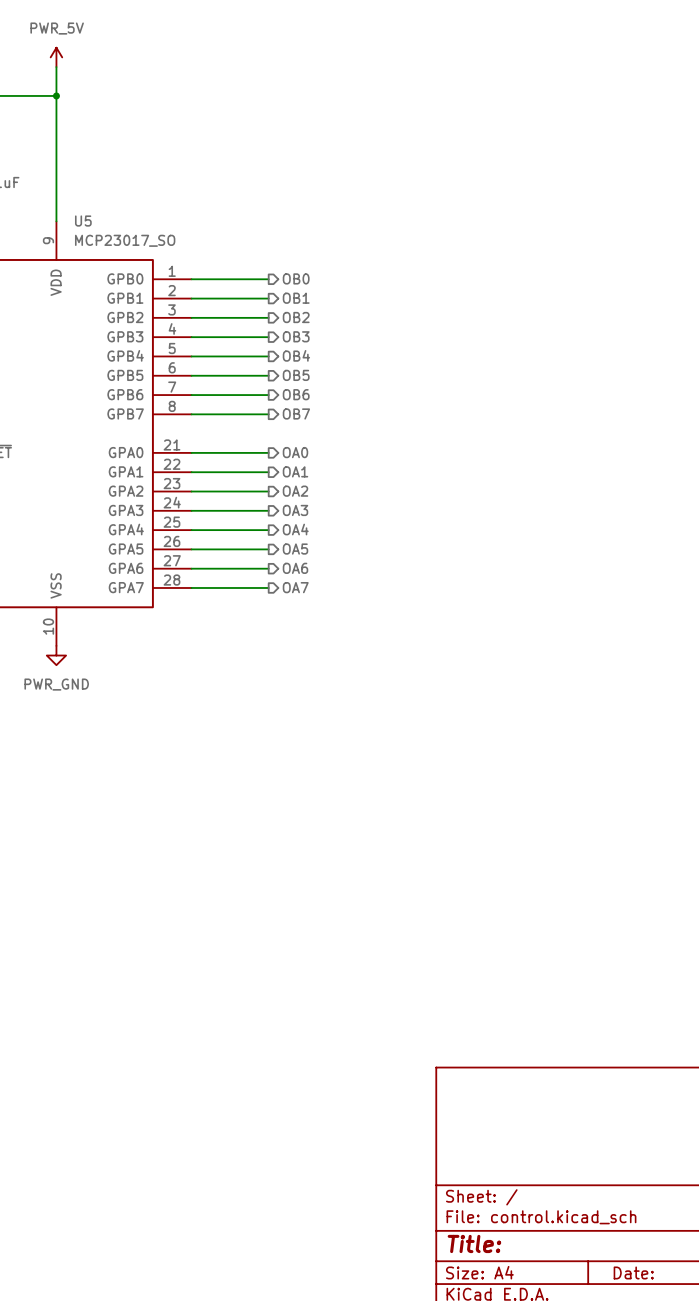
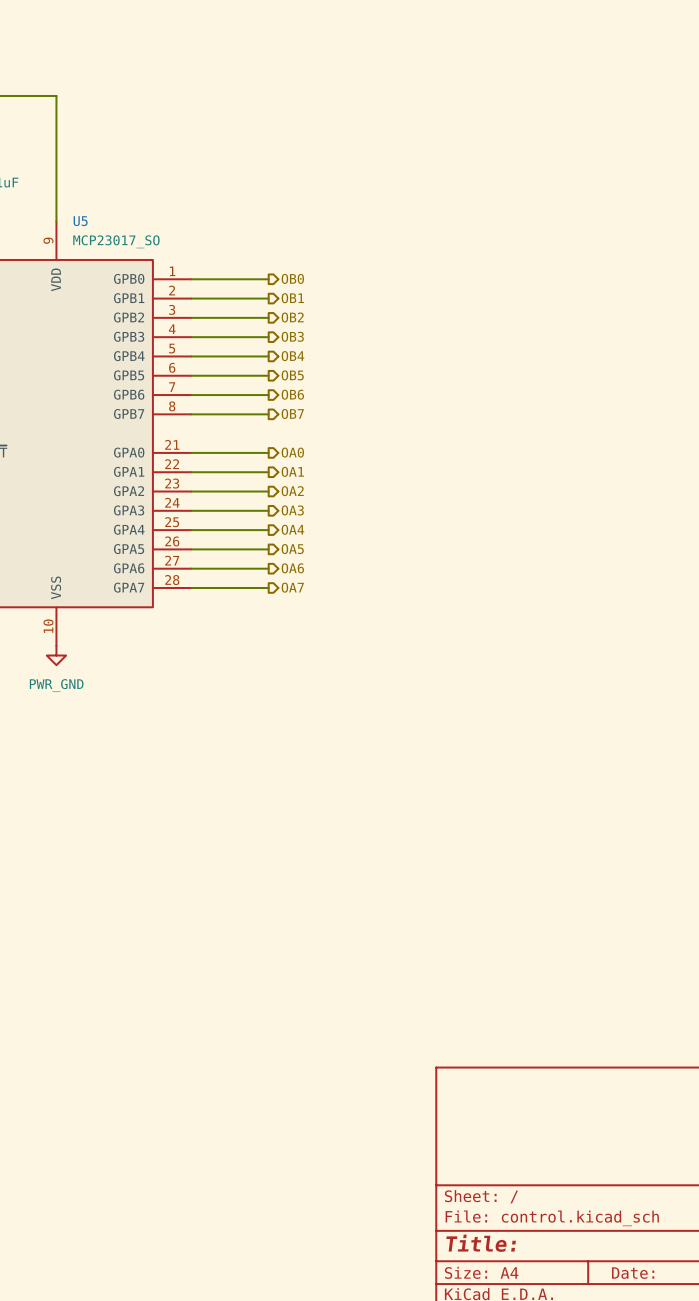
power symbol: PWR_5V (56, 57) -> none
wire: (56, 67) (56, 95) -> none
junction: (56, 95) -> none

